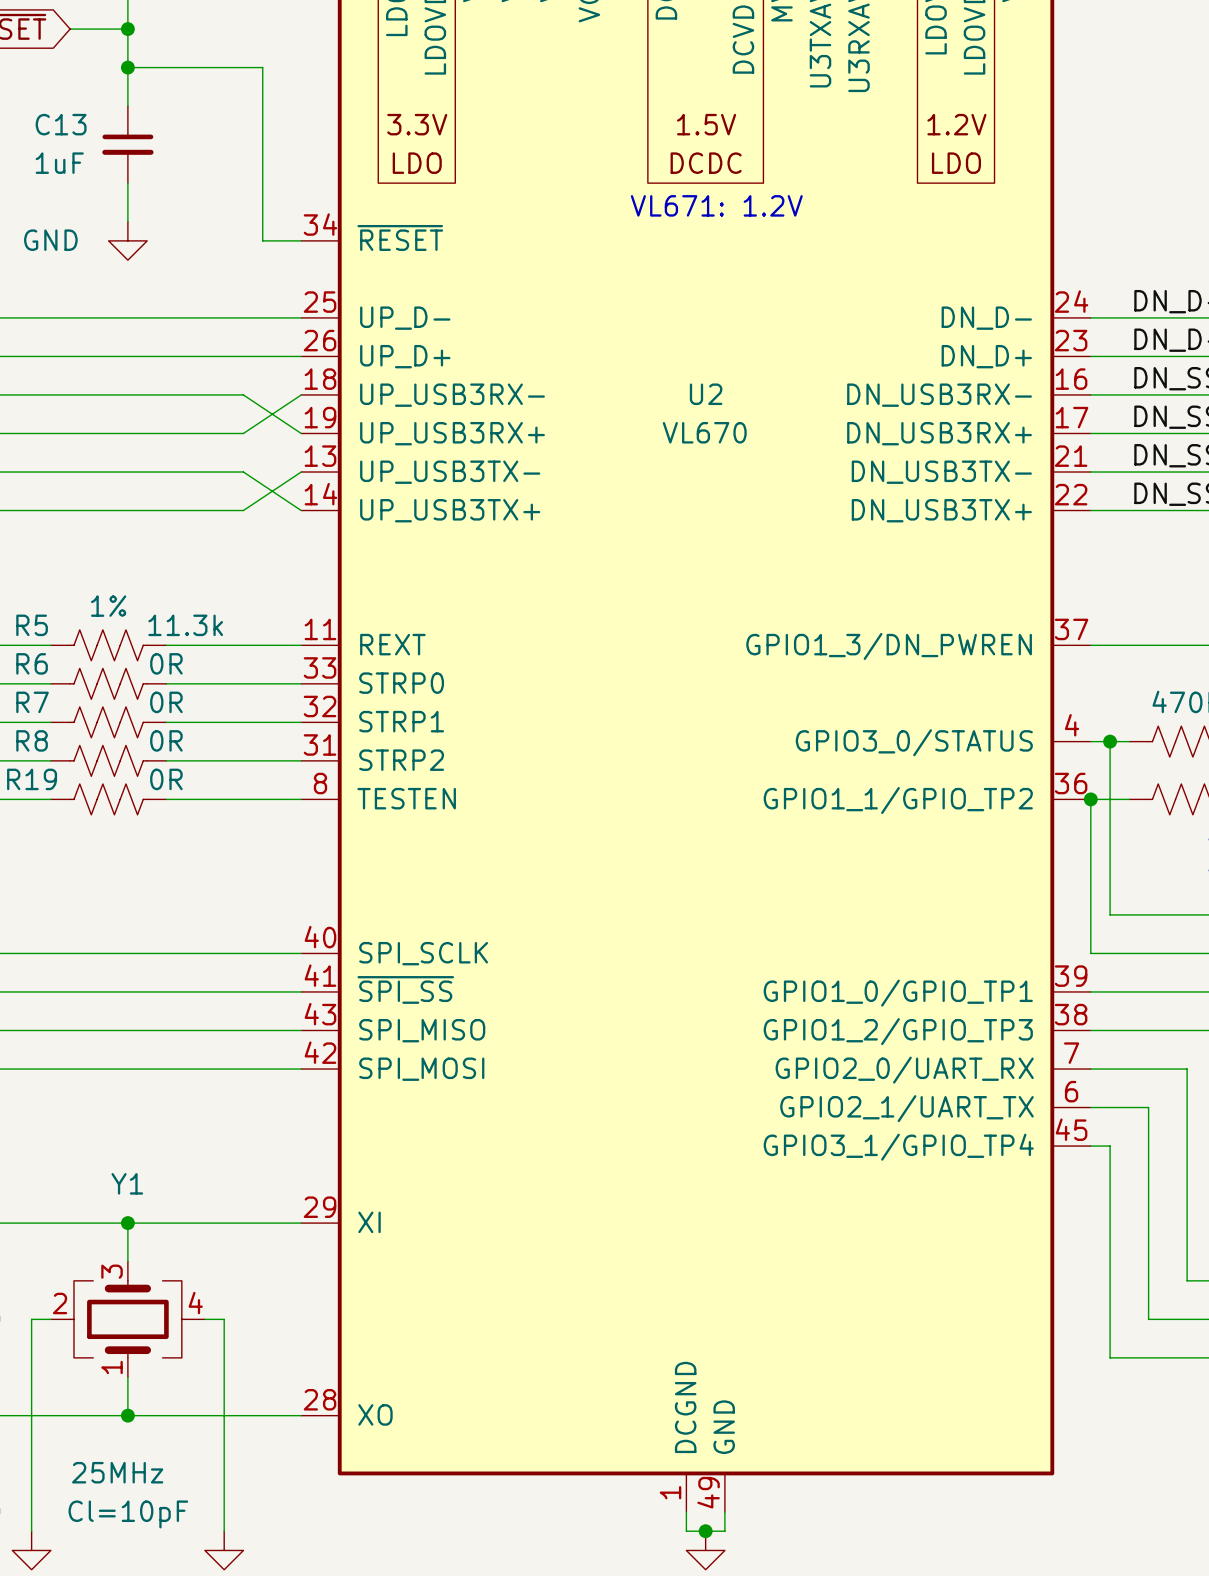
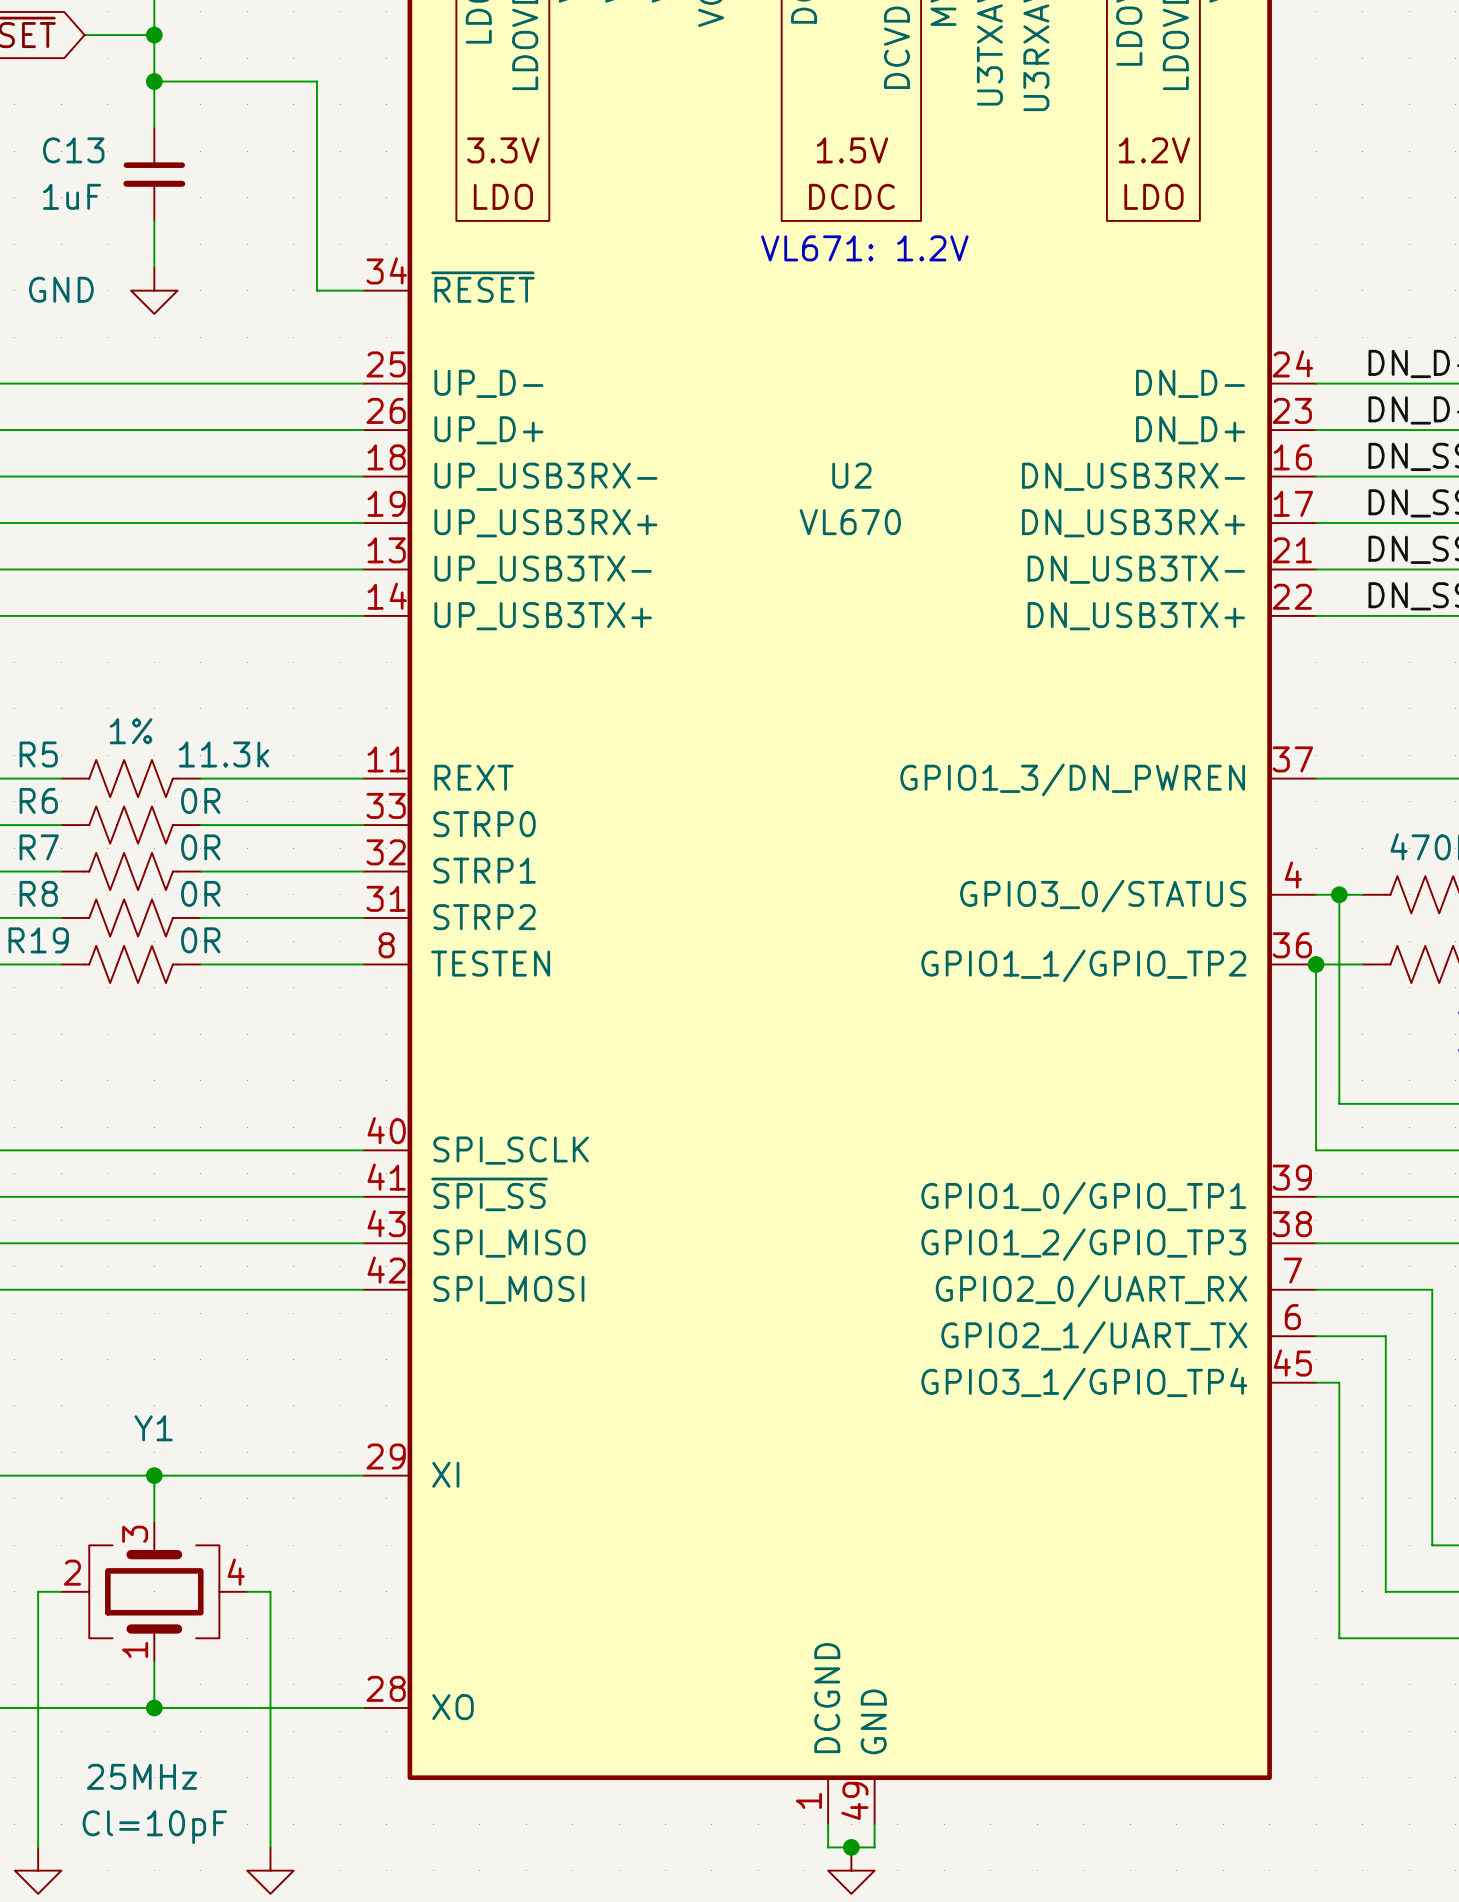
wire: (243, 394) (301, 433) -> (293, 476) (363, 476)
wire: (301, 394) (243, 433) -> (363, 523) (293, 523)
wire: (243, 472) (301, 510) -> (293, 569) (363, 569)
wire: (301, 472) (243, 510) -> (363, 615) (293, 615)

